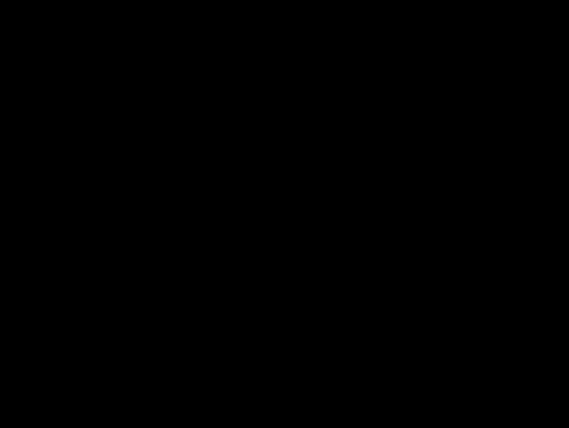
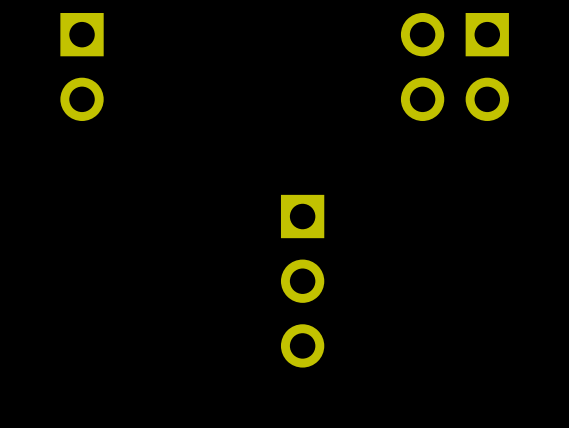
part: none -> (82, 66)
part: none -> (454, 66)
part: none -> (302, 281)

